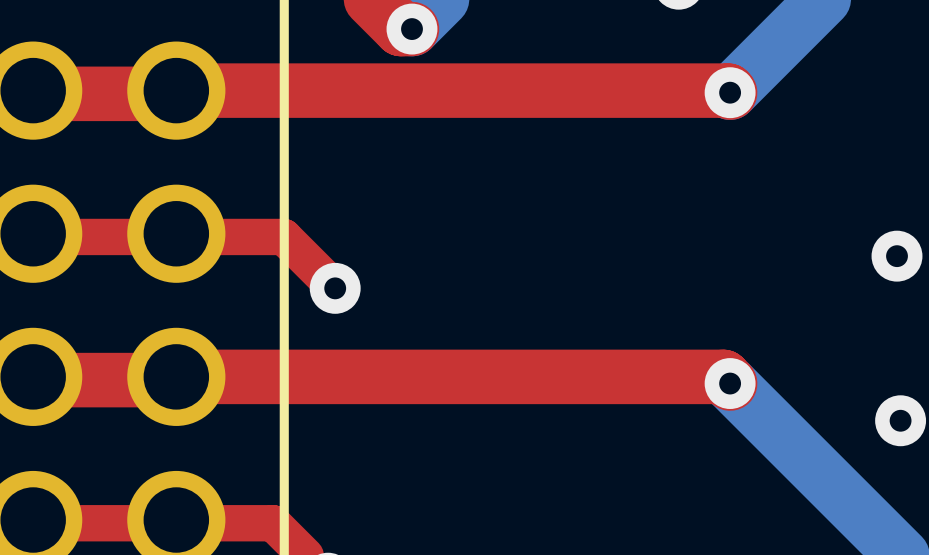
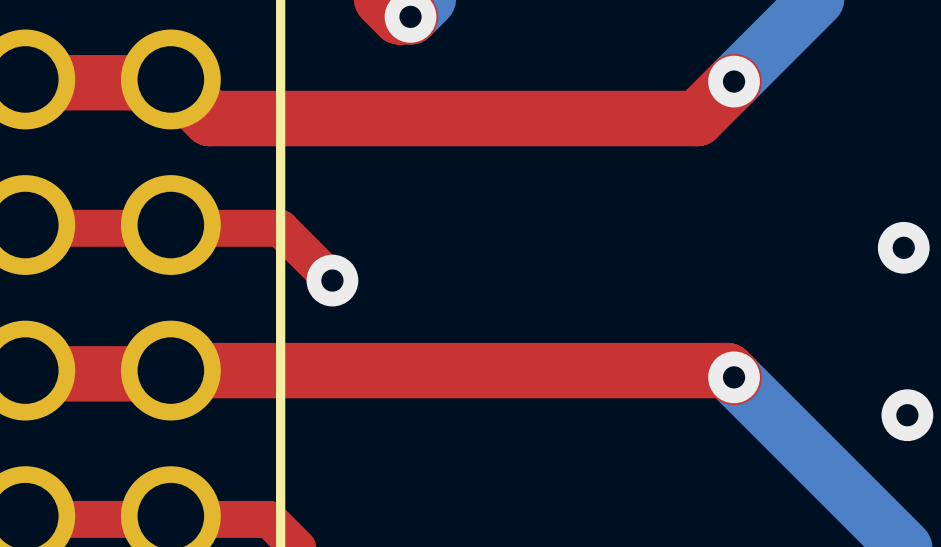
top track: (176, 90) (728, 90) (730, 92) -> (170, 79) (209, 118) (697, 118) (734, 81)

